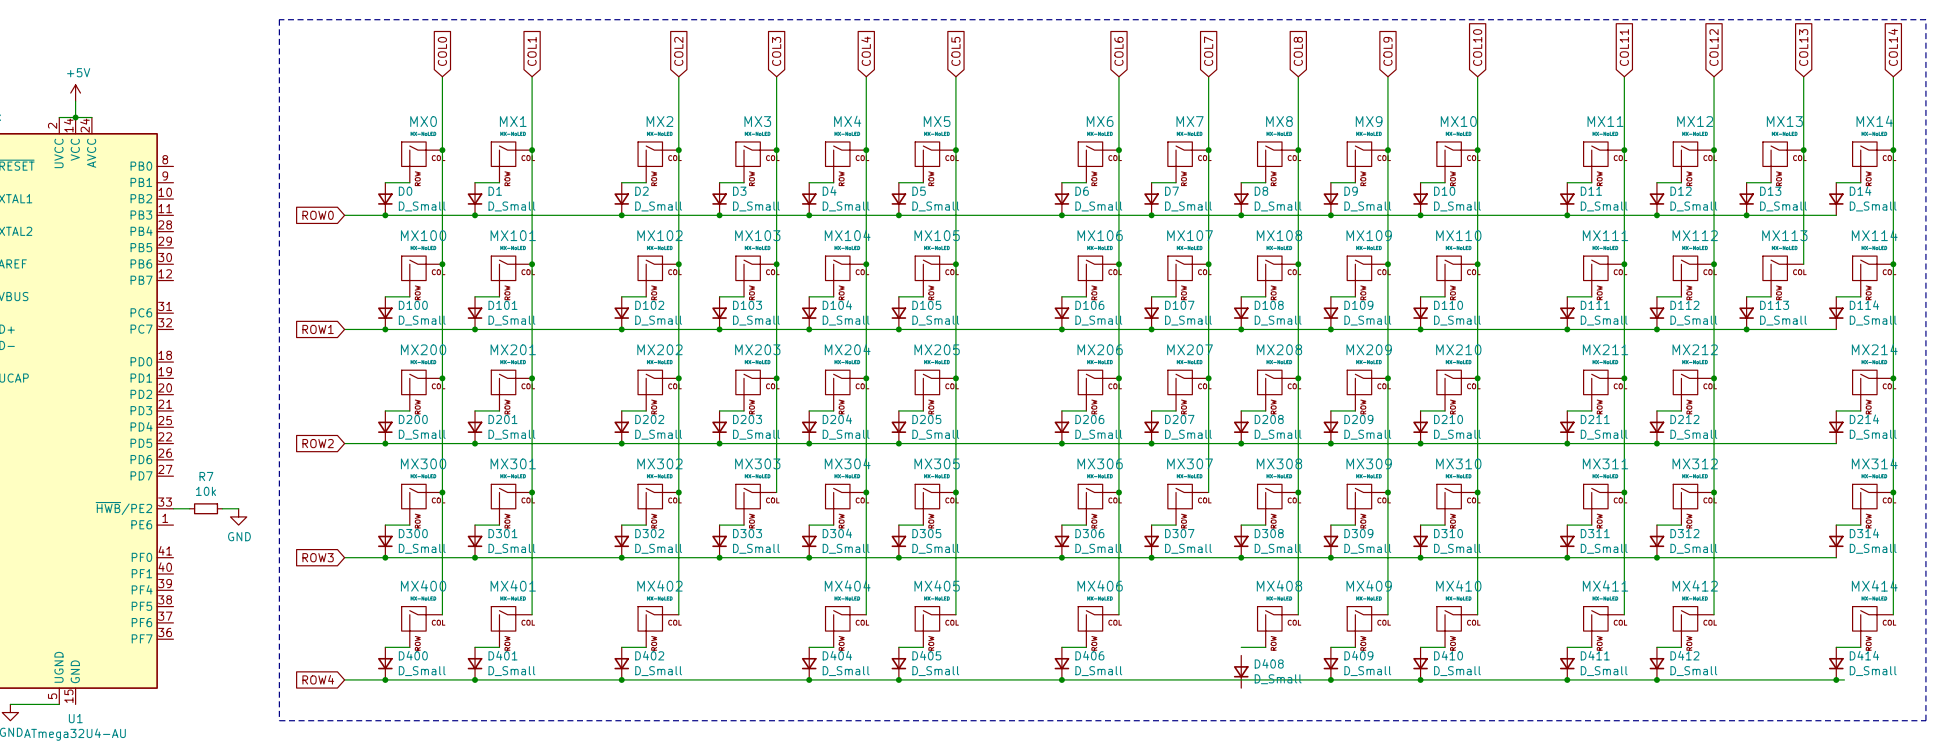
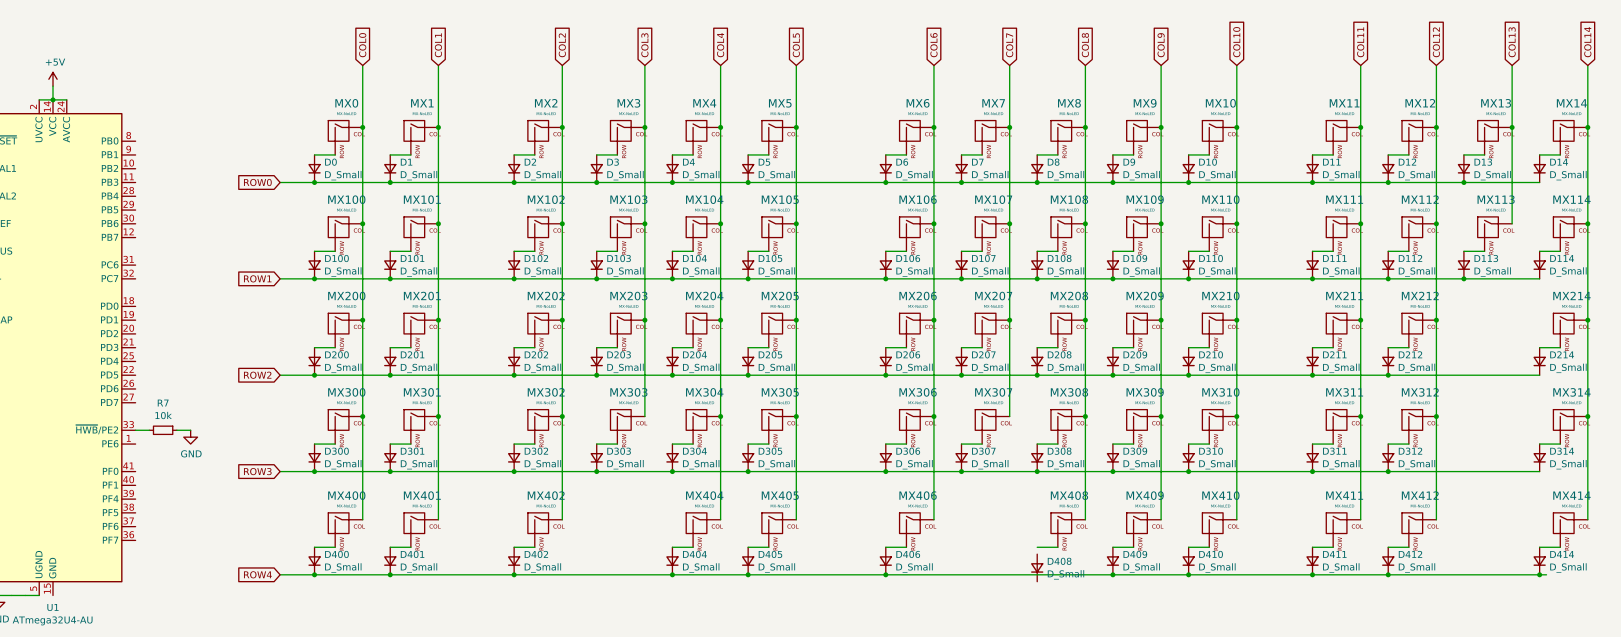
line: (279, 19) (279, 720) (1925, 720) (1925, 19) (279, 19) -> none

